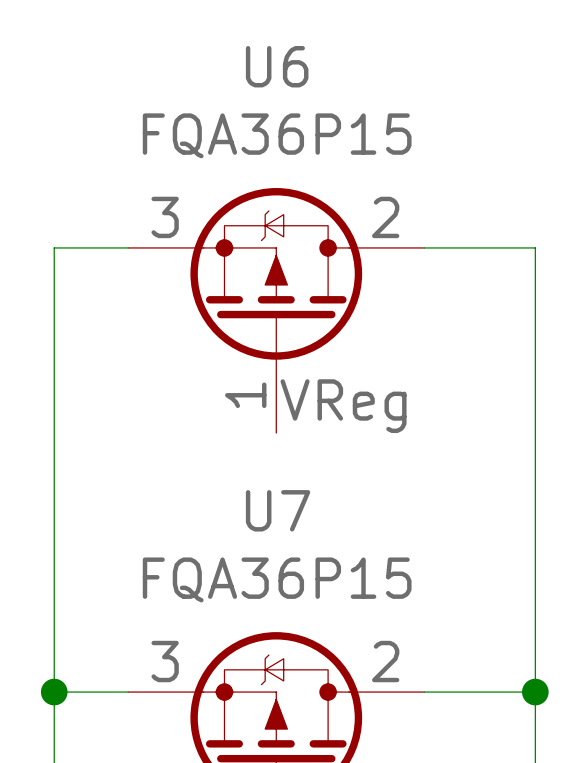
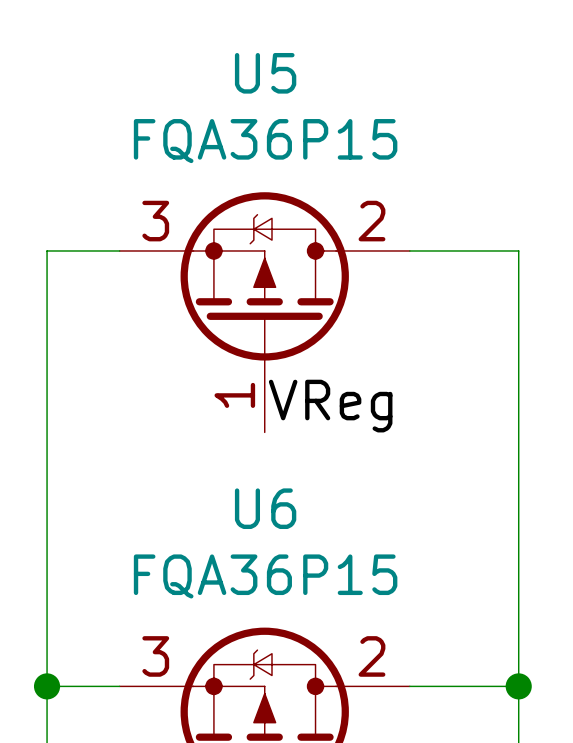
U6 name: U6 (277, 66) -> U5 (265, 73)
U7 name: U7 (278, 510) -> U6 (265, 508)

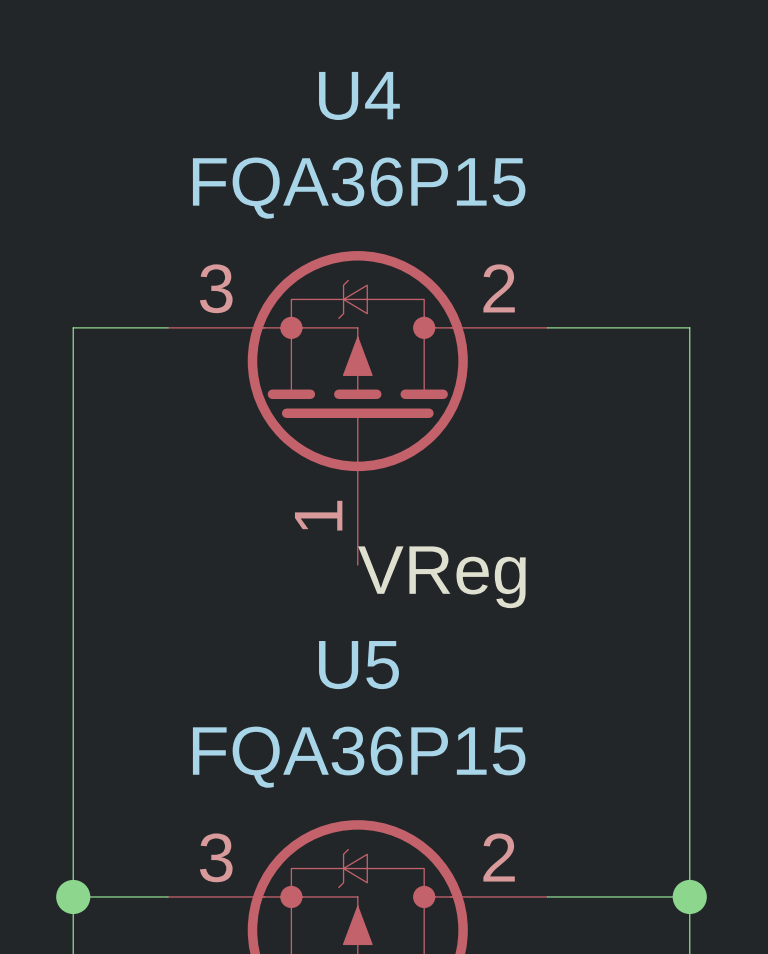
U5 name: U5 (265, 73) -> U4 (359, 95)
label position: VReg (330, 406) -> VReg (441, 577)
U6 name: U6 (265, 508) -> U5 (359, 665)

